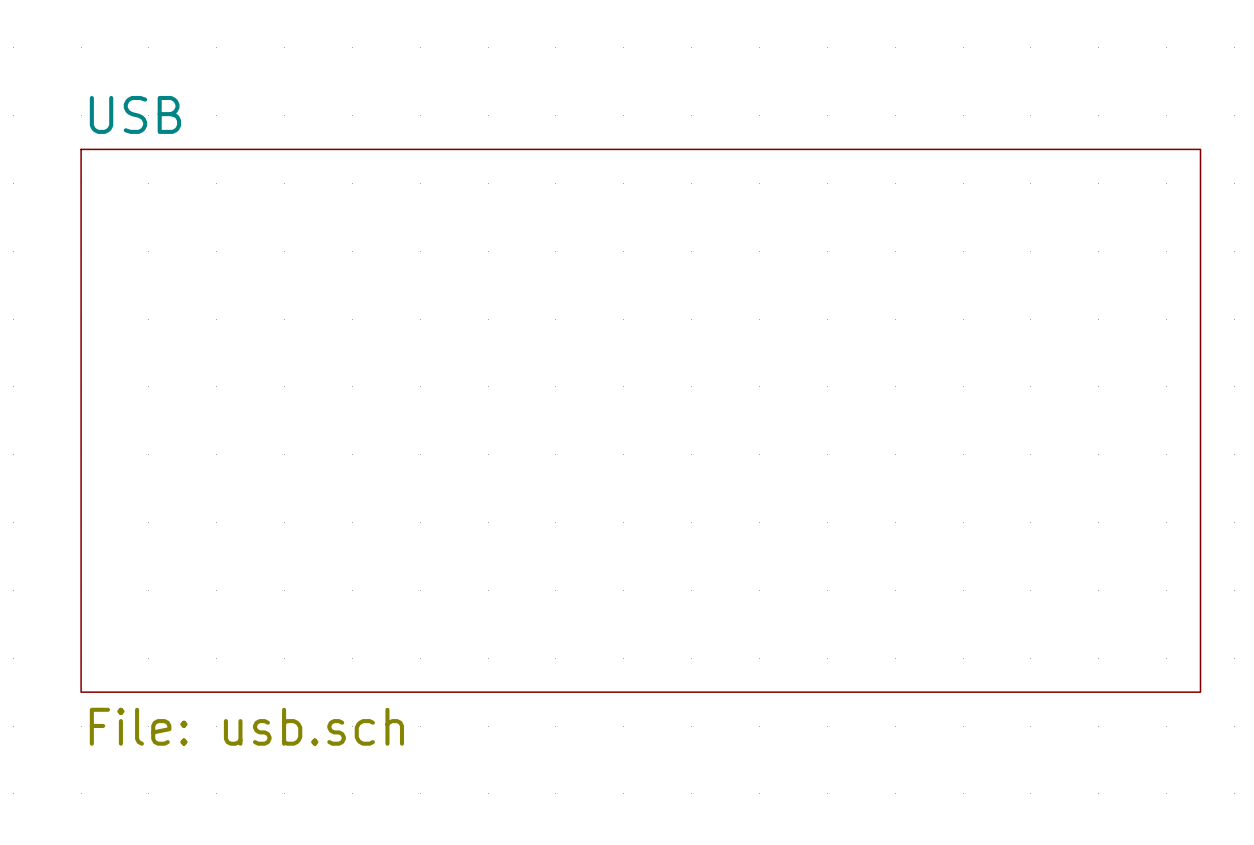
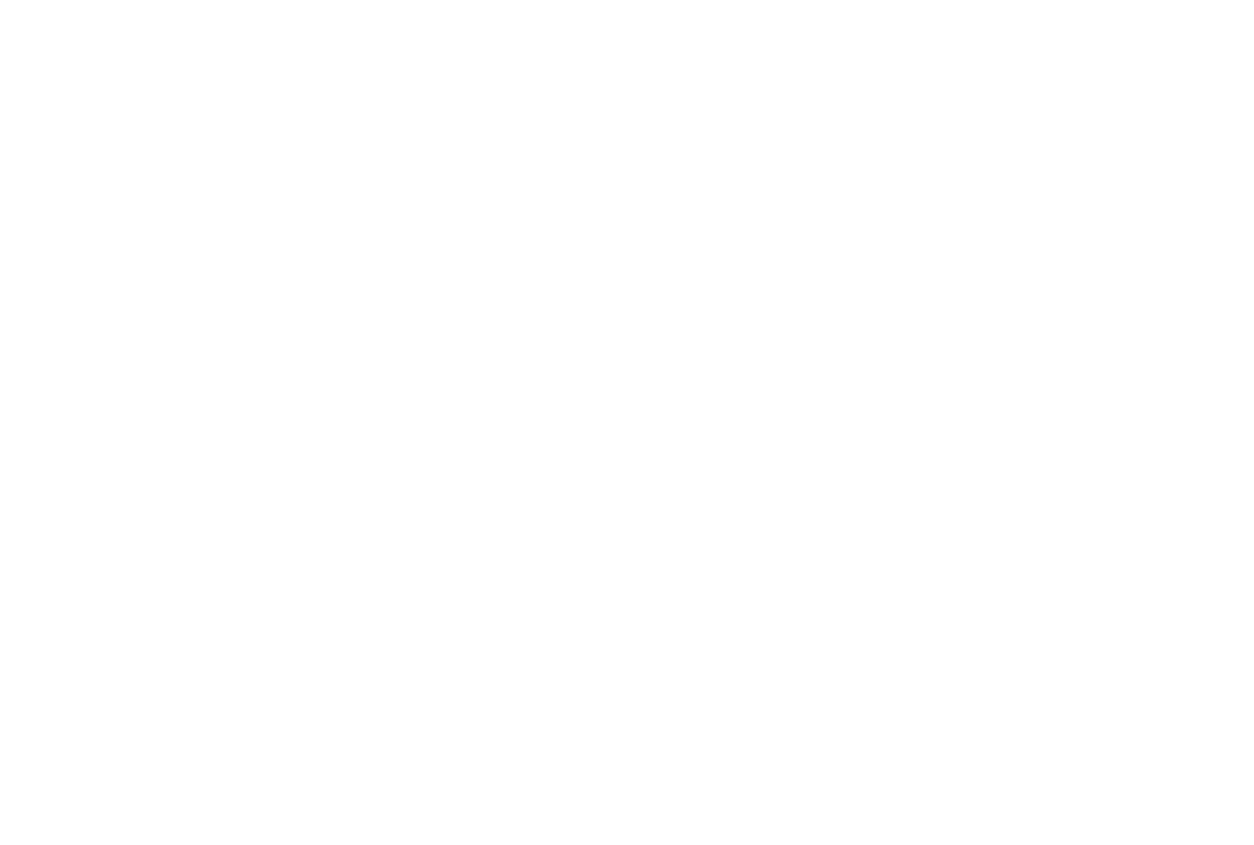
sheet USB: File: usb.sch (640, 420) -> none

